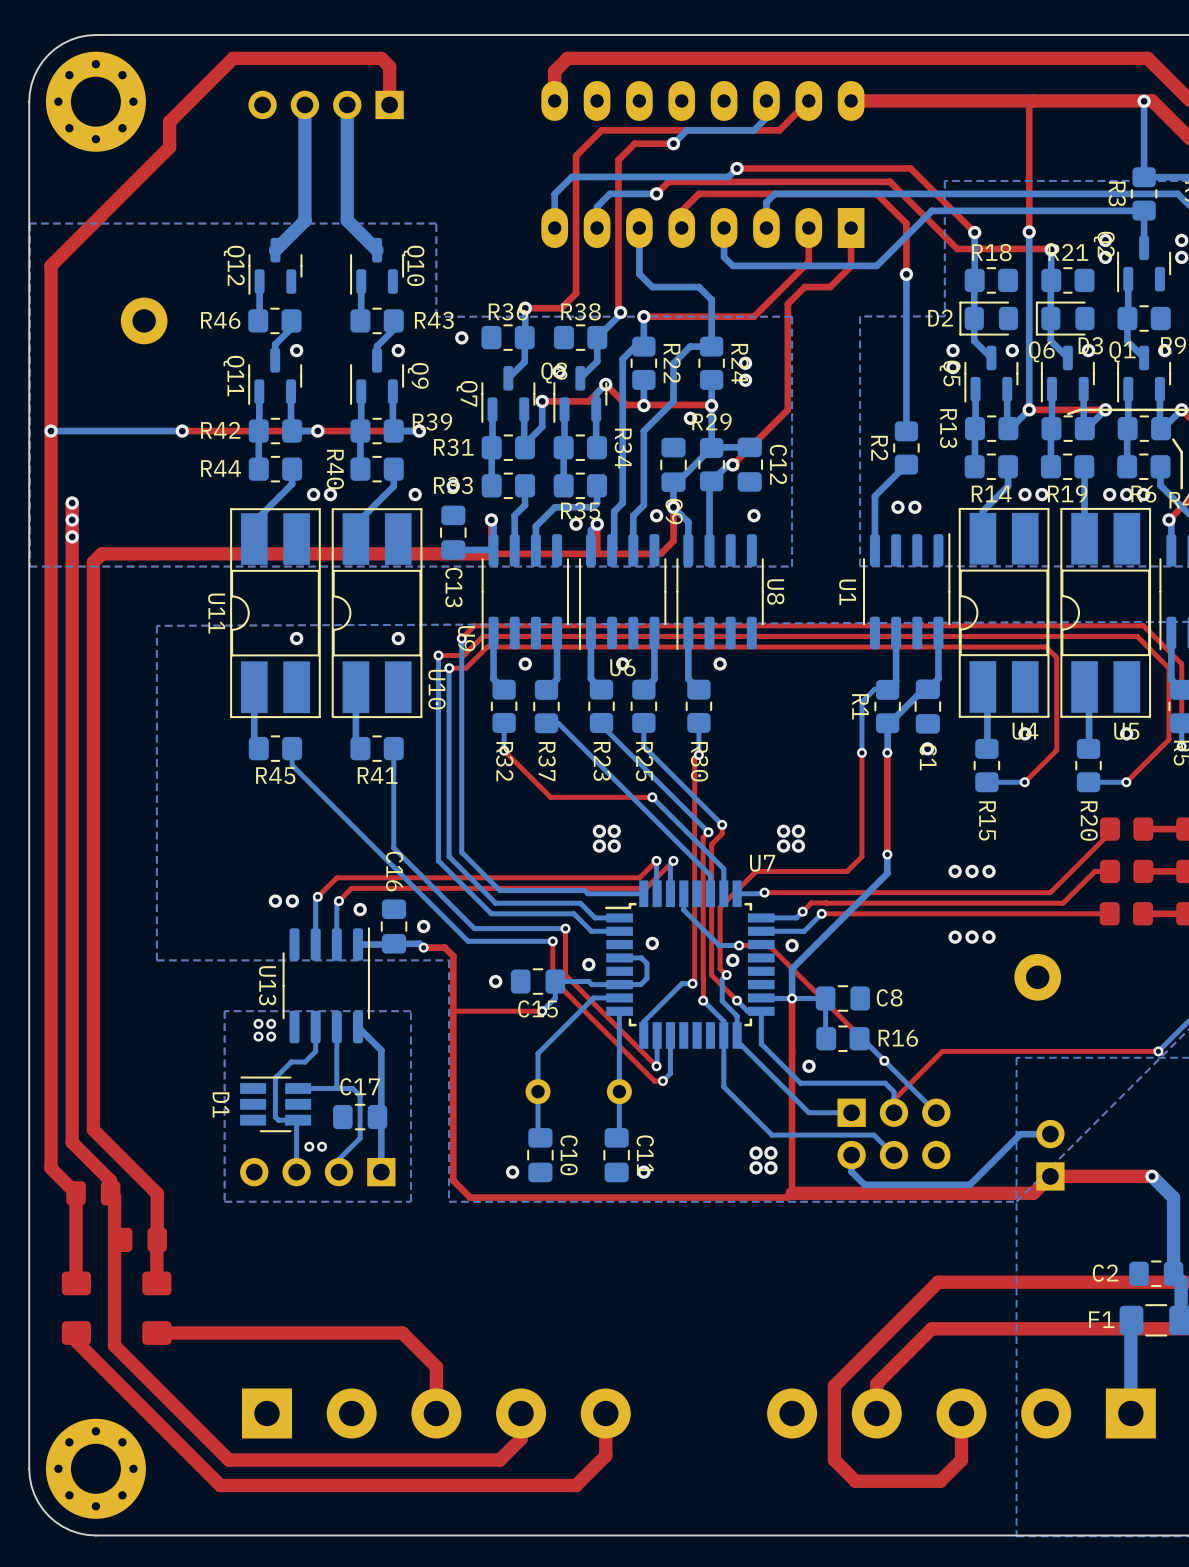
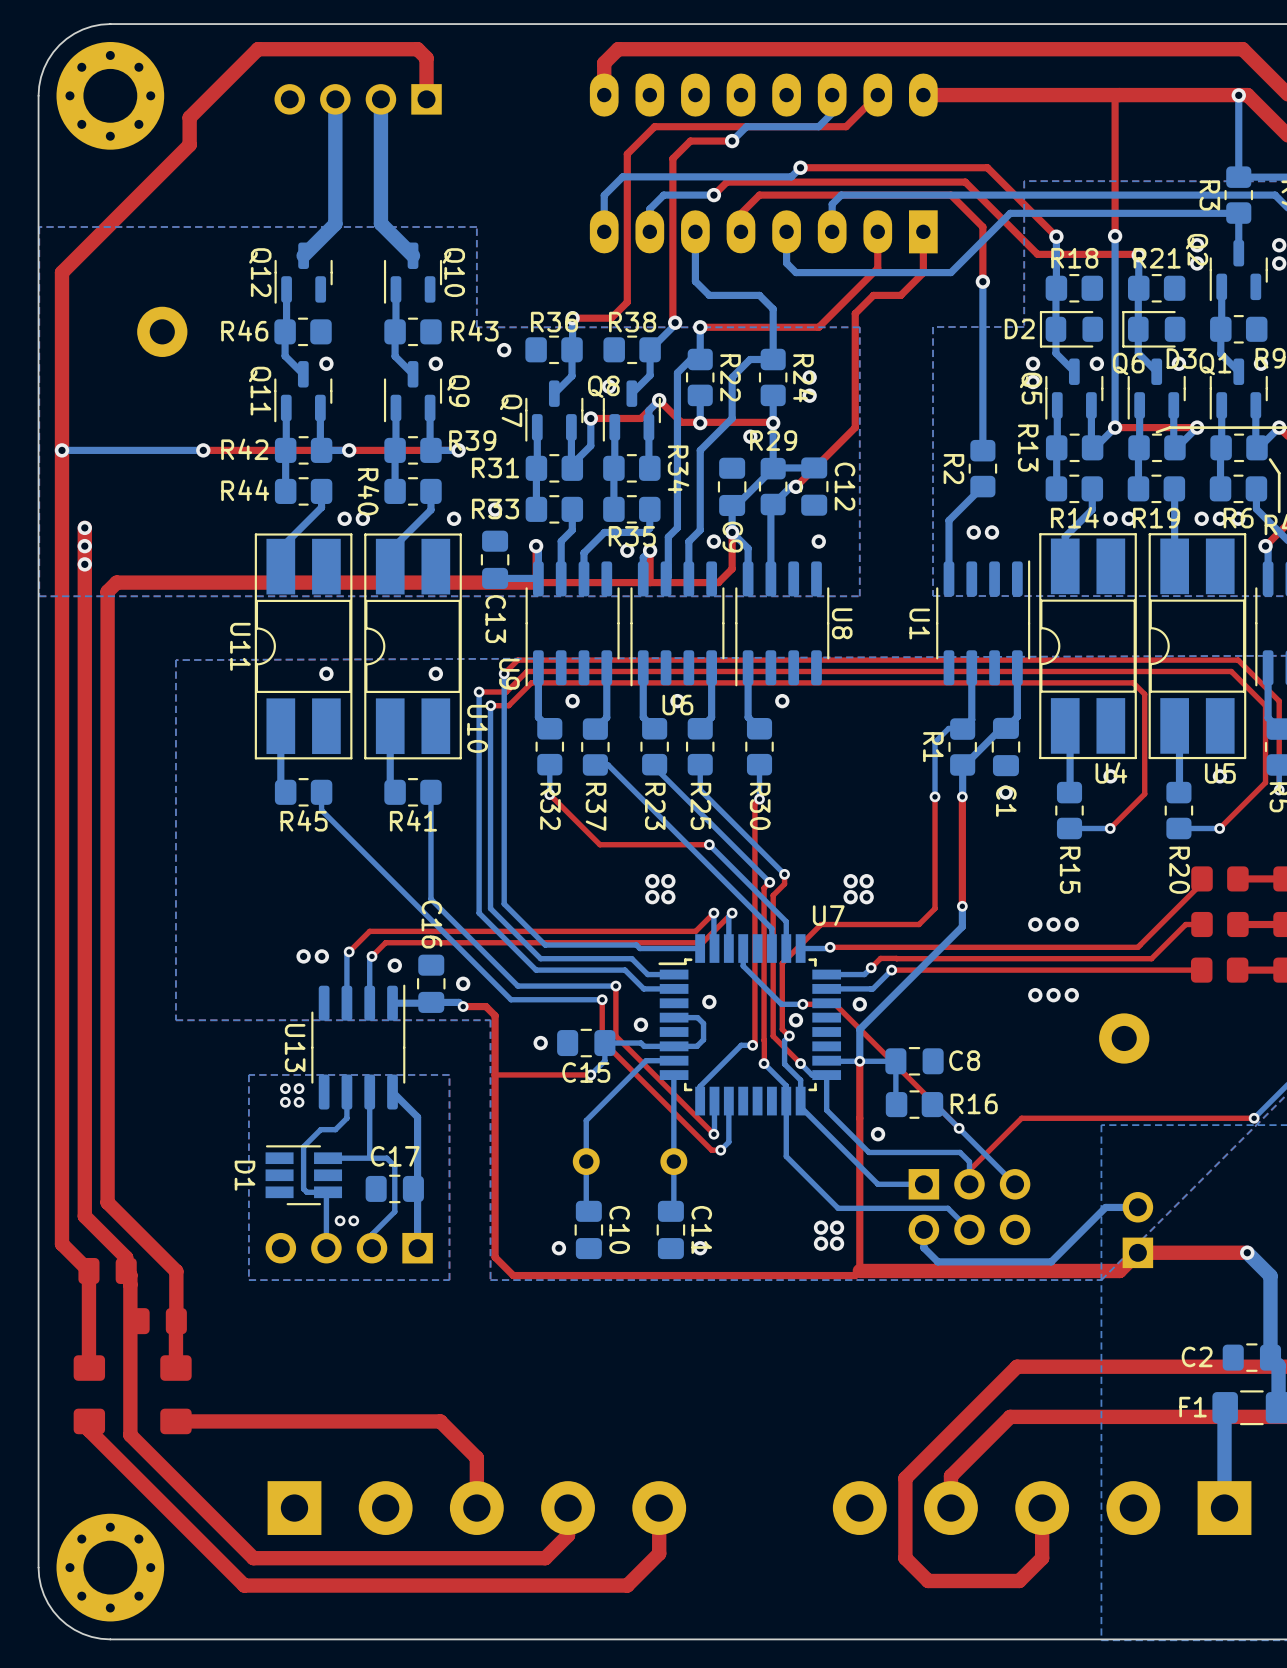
bottom track: (291, 320) (291, 328) (275, 344) (275, 360) -> (285, 331) (285, 356) (303, 374)
bottom track: (393, 320) (393, 329) (377, 346) (377, 360) -> (395, 331) (395, 356) (413, 374)

